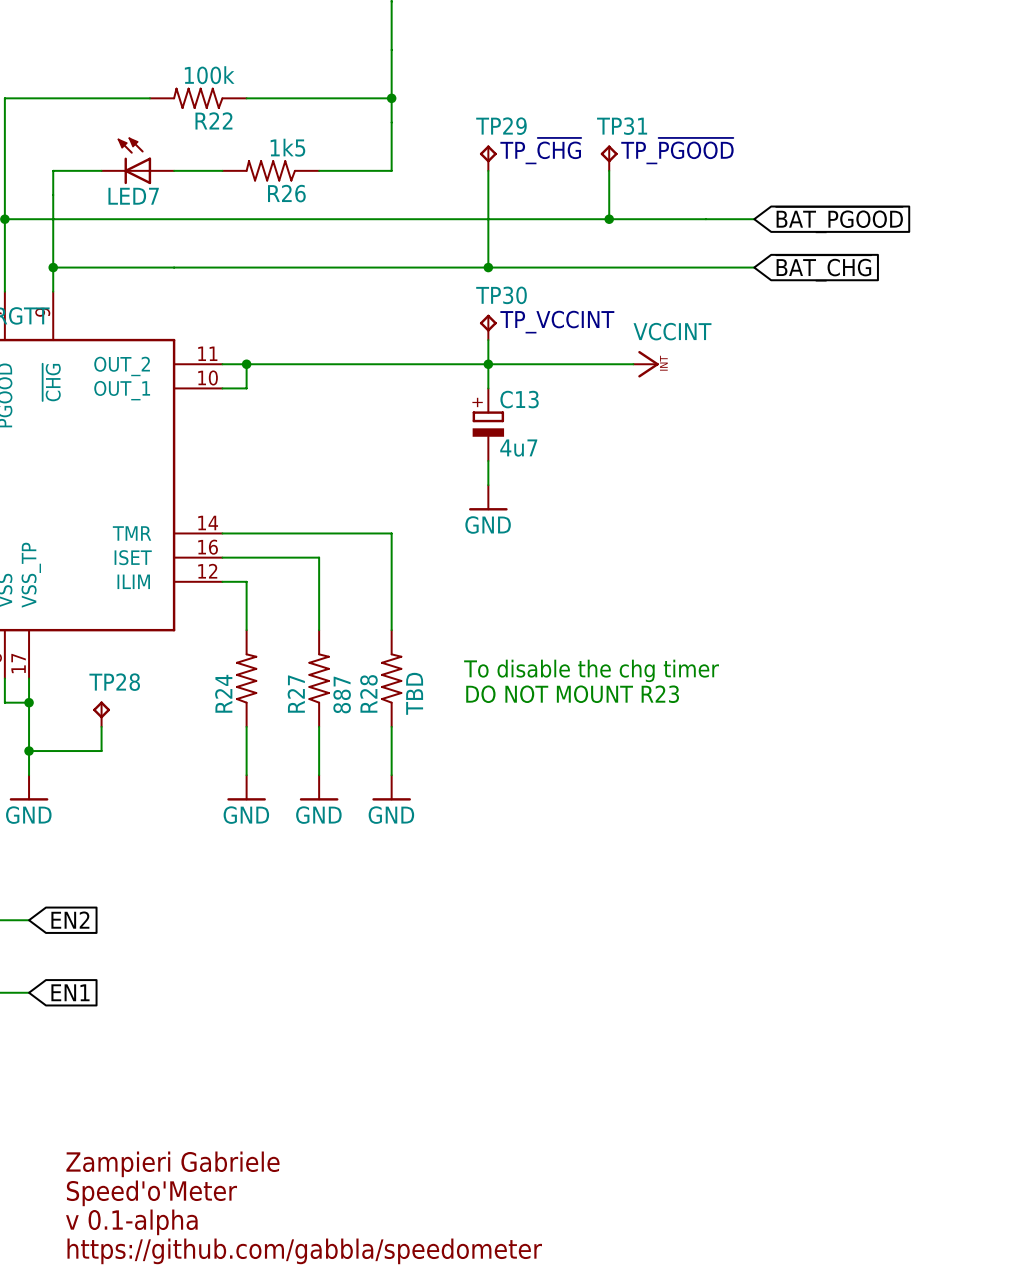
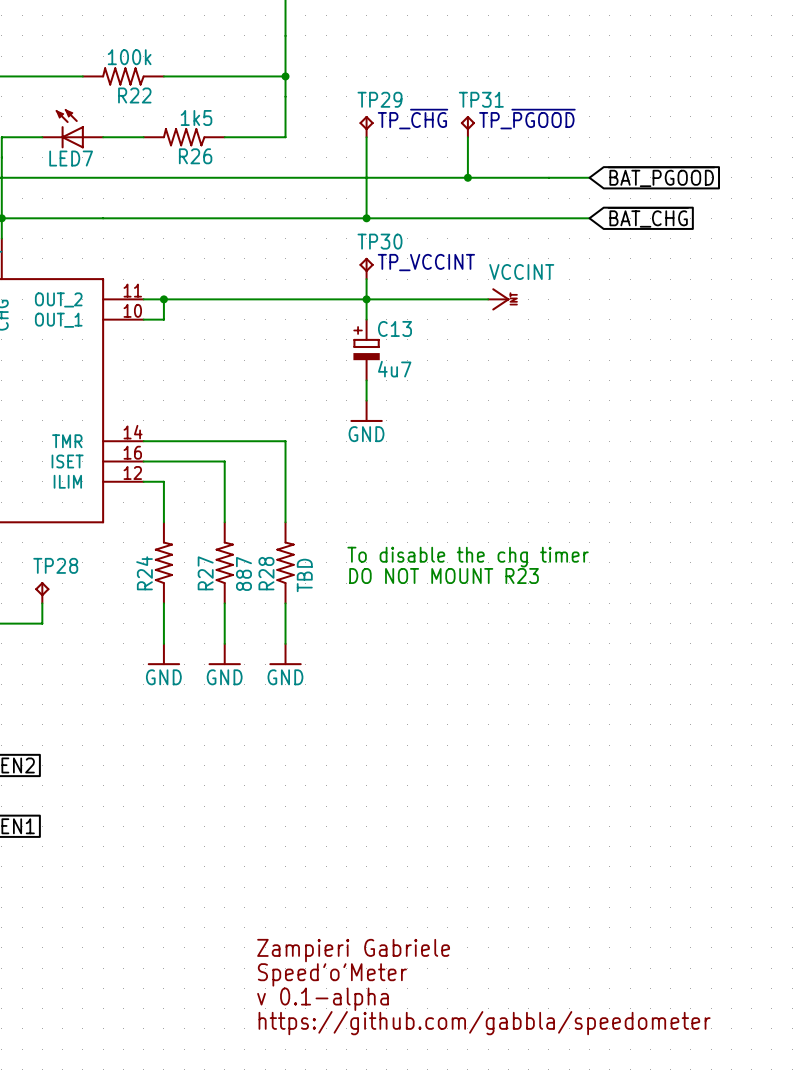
text: none -> Zampieri Gabriele (353, 950)
text: Zampieri Gabriele (172, 1164) -> none
text: none -> Speed'o'Meter (332, 974)
text: Speed'o'Meter (151, 1193) -> none
text: none -> v 0.1-alpha (323, 999)
text: v 0.1-alpha (131, 1222) -> none
text: none -> https://github.com/gabbla/speedometer (484, 1023)
text: https://github.com/gabbla/speedometer (304, 1251) -> none

